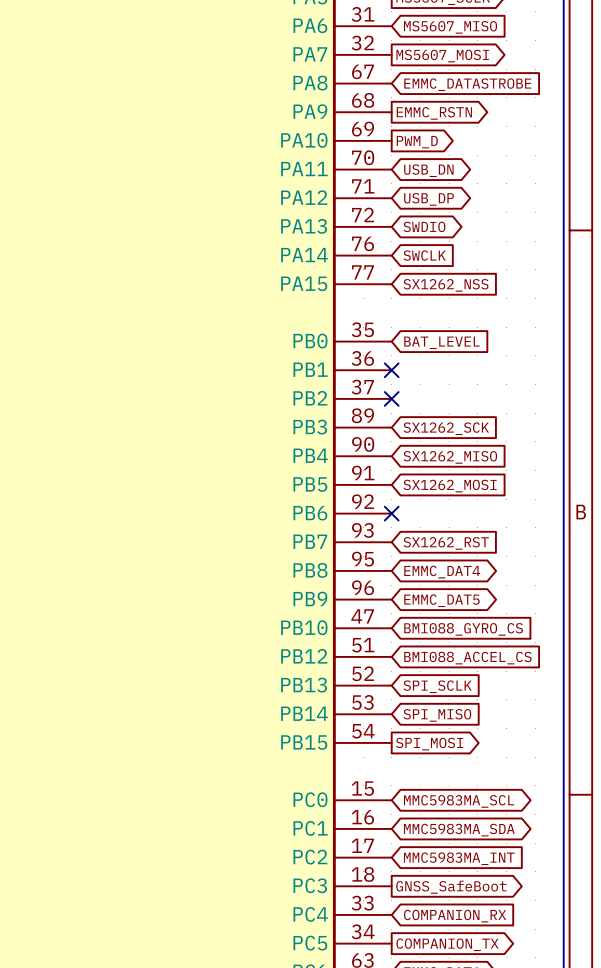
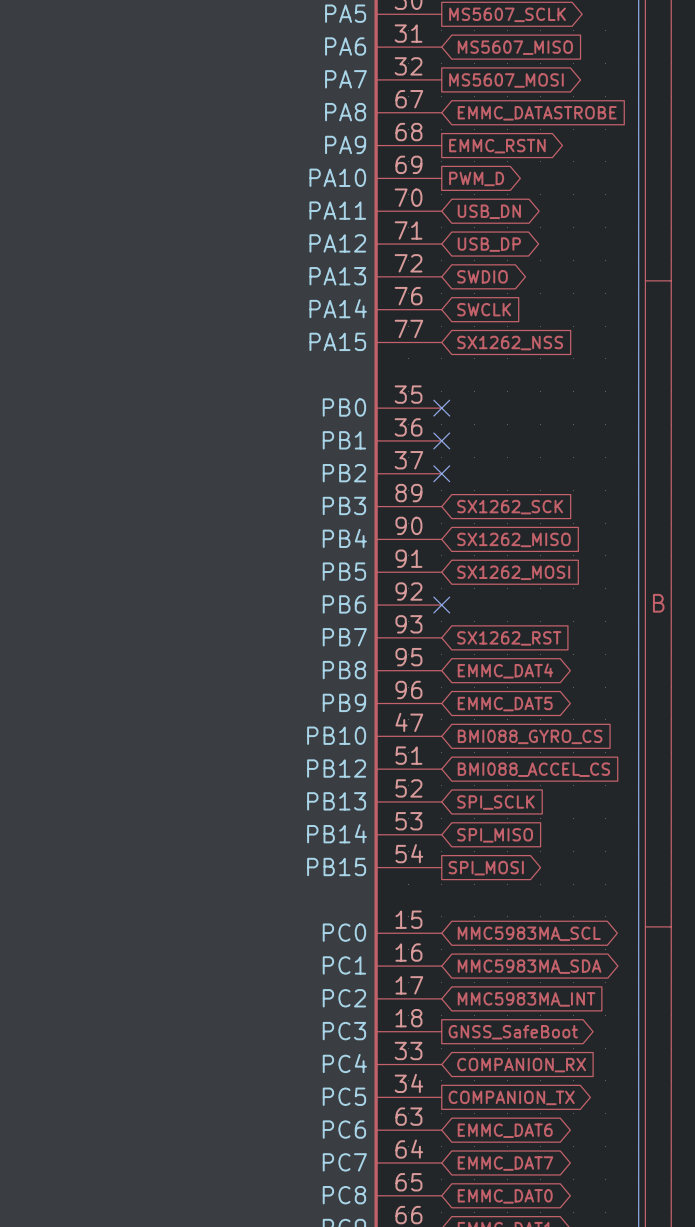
no-connect mark: none -> (441, 408)
global label: BAT_LEVEL (441, 342) -> none

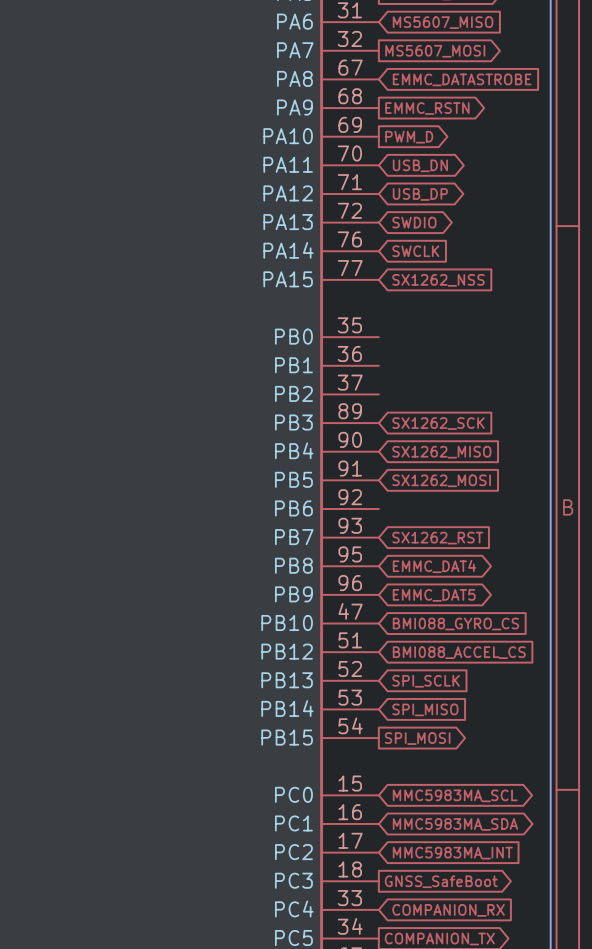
no-connect mark: (441, 408) -> none
no-connect mark: (441, 440) -> none
no-connect mark: (441, 473) -> none
no-connect mark: (441, 605) -> none

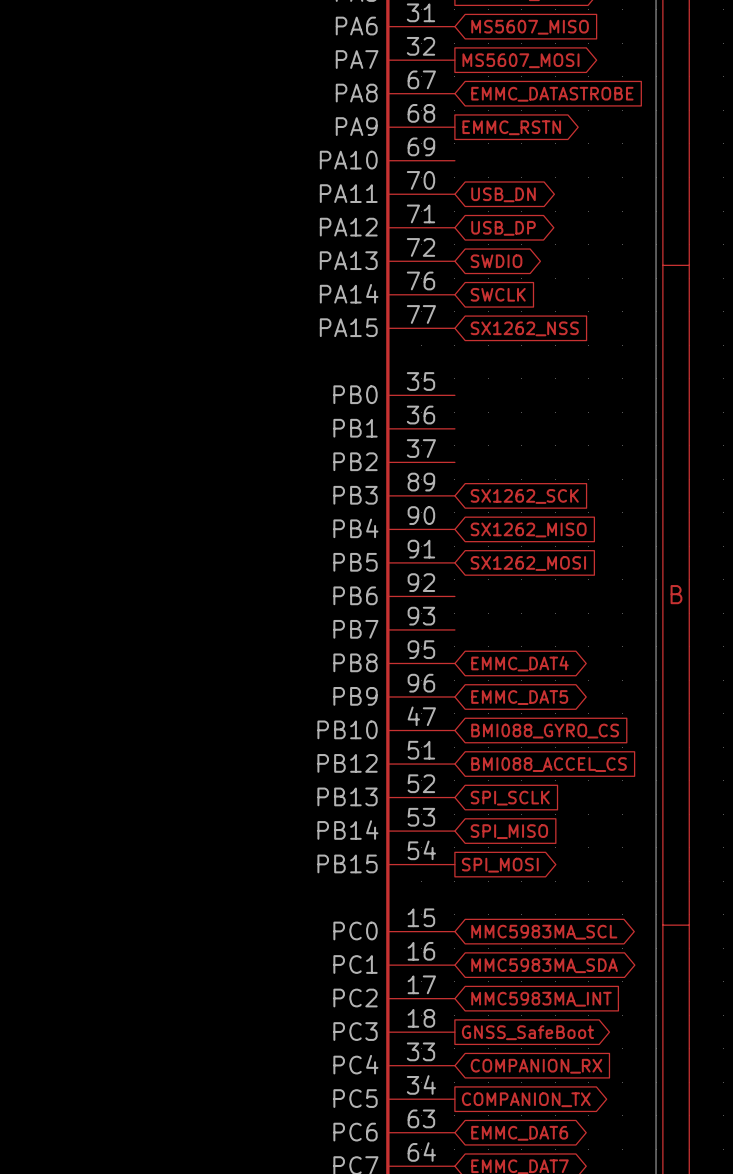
global label: PWM_D (409, 137) -> none
global label: SX1262_RST (437, 538) -> none

